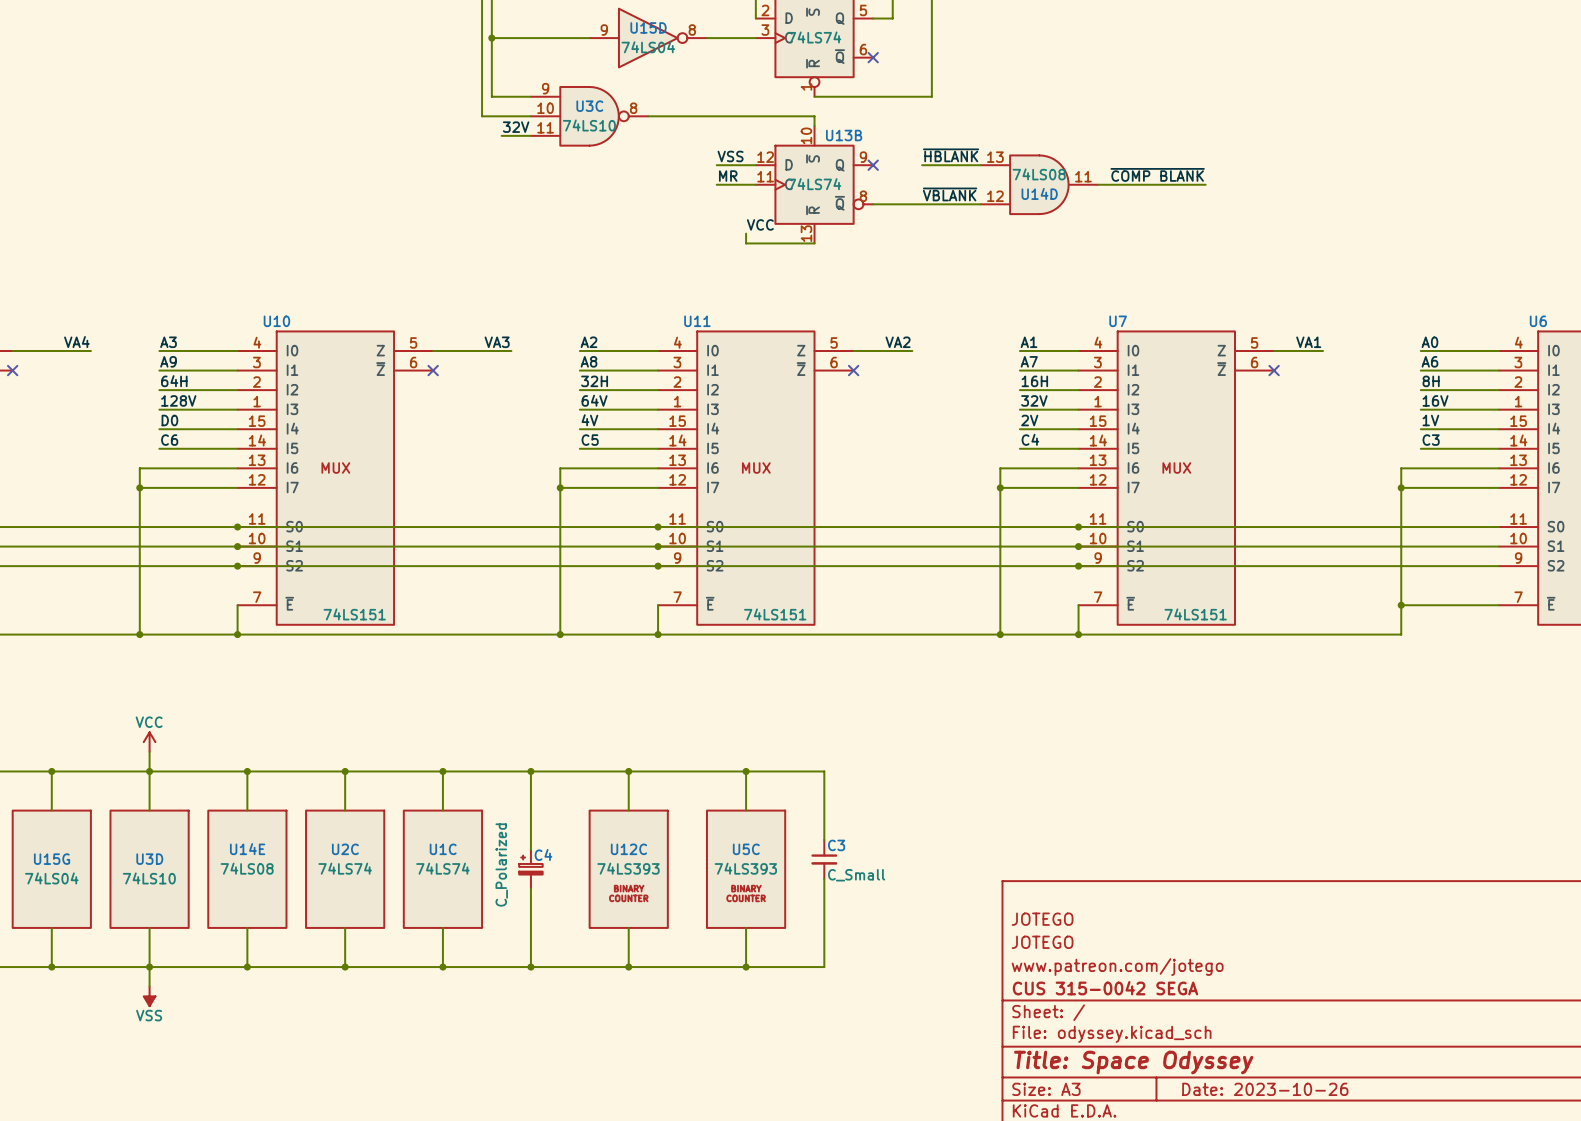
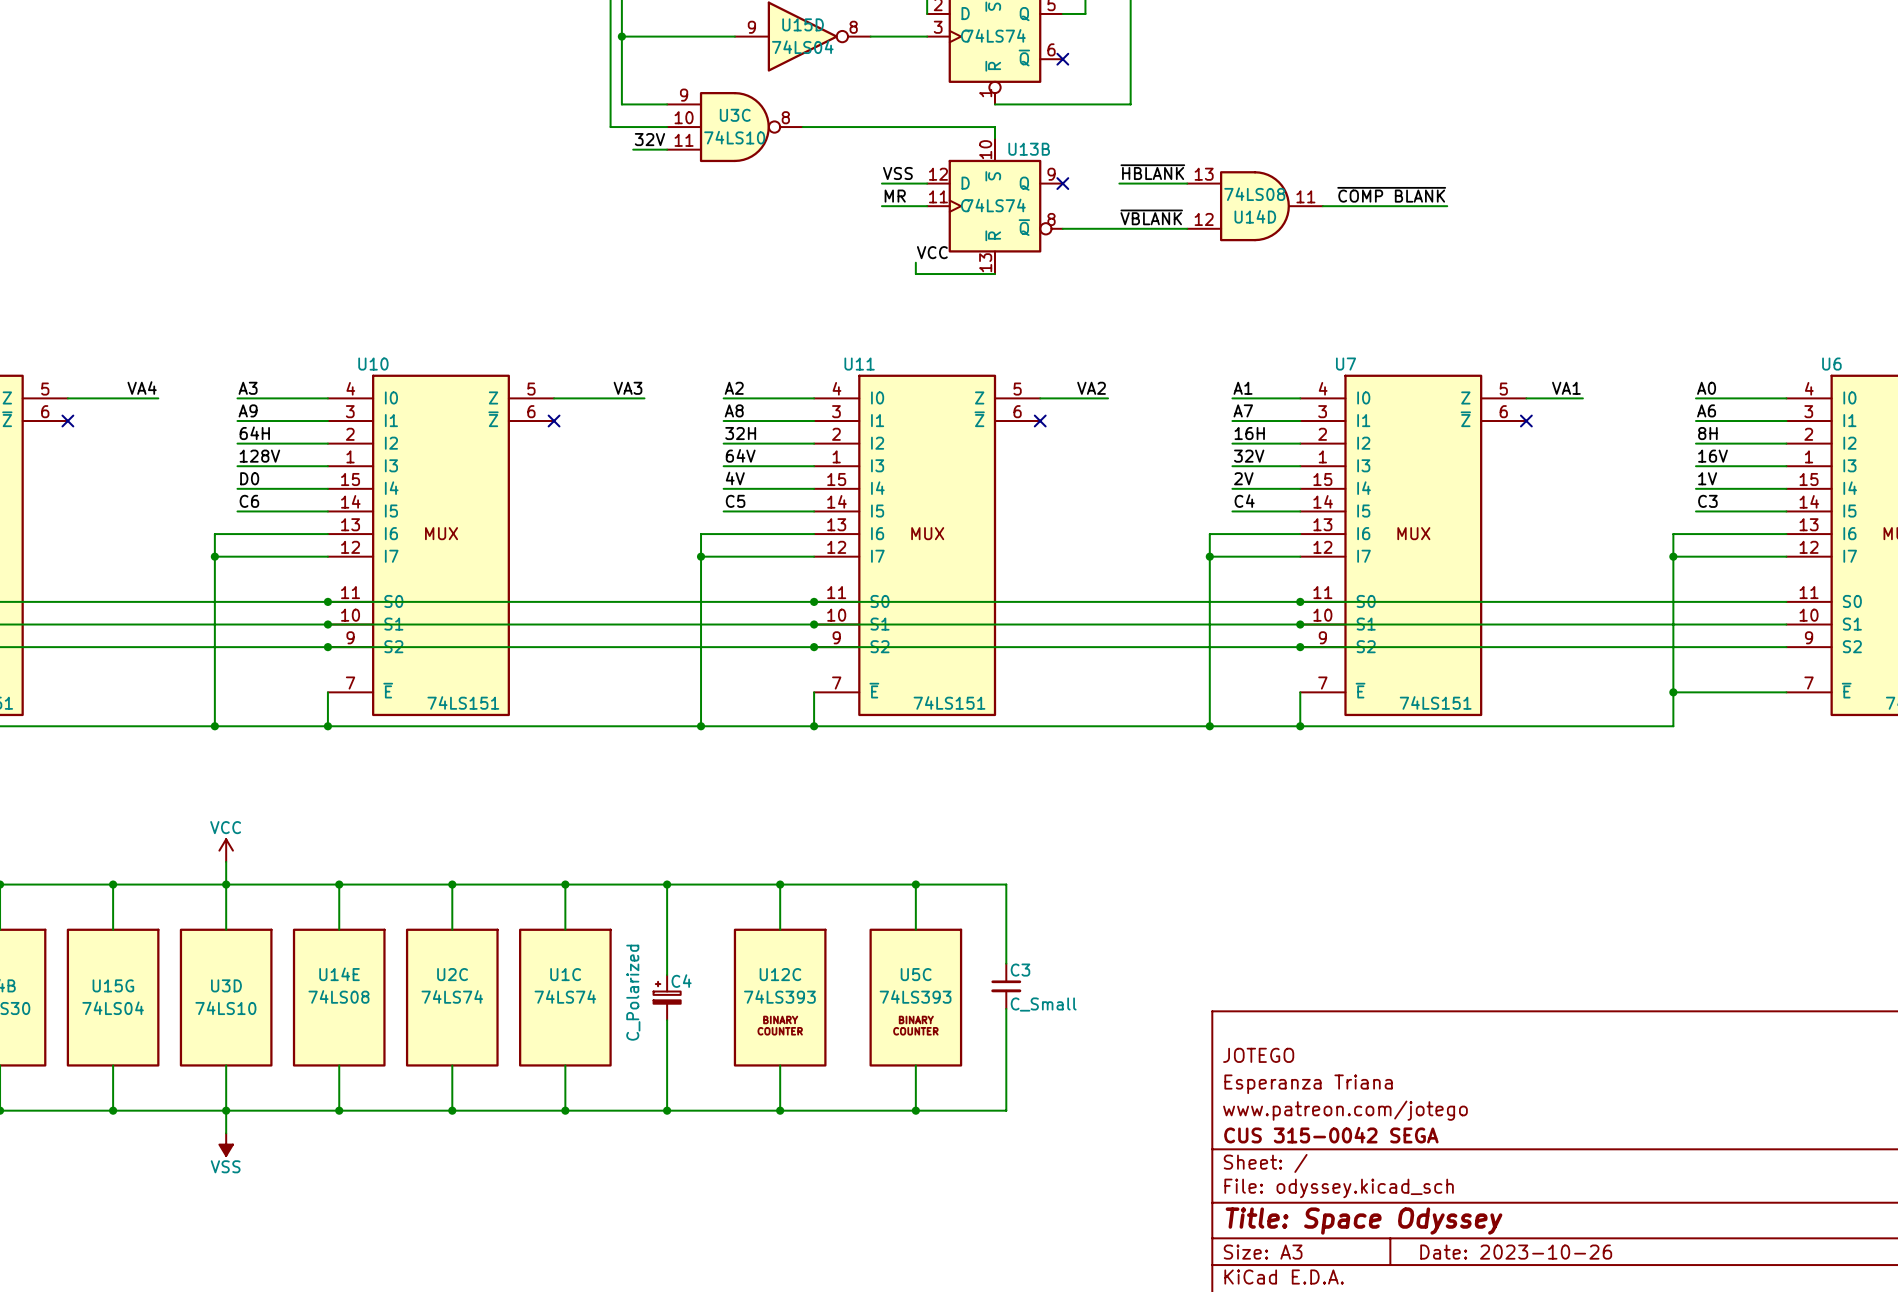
title block: JOTEGO (1042, 942) -> Esperanza Triana (1308, 1084)

